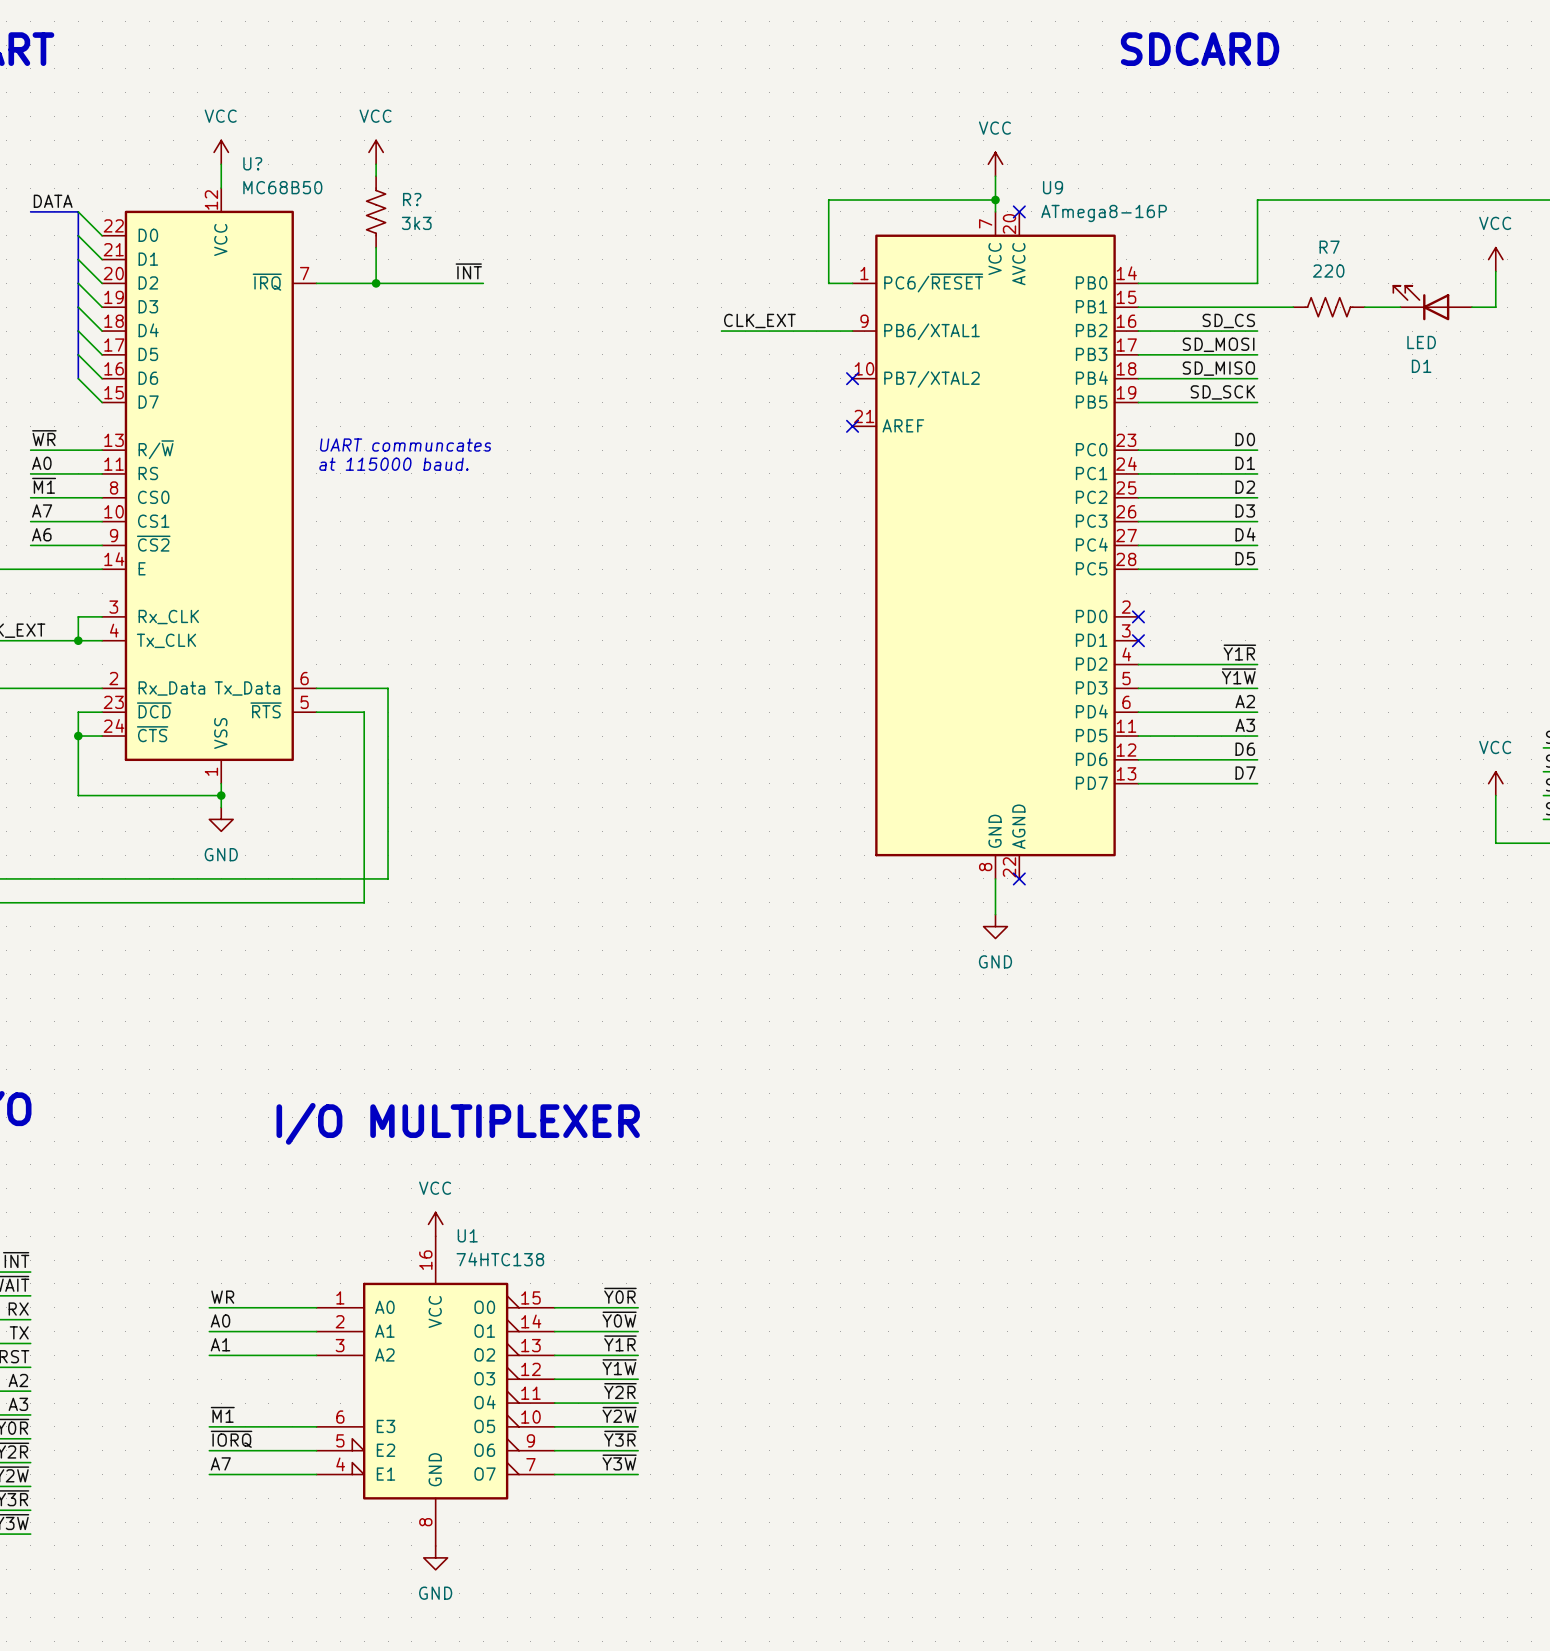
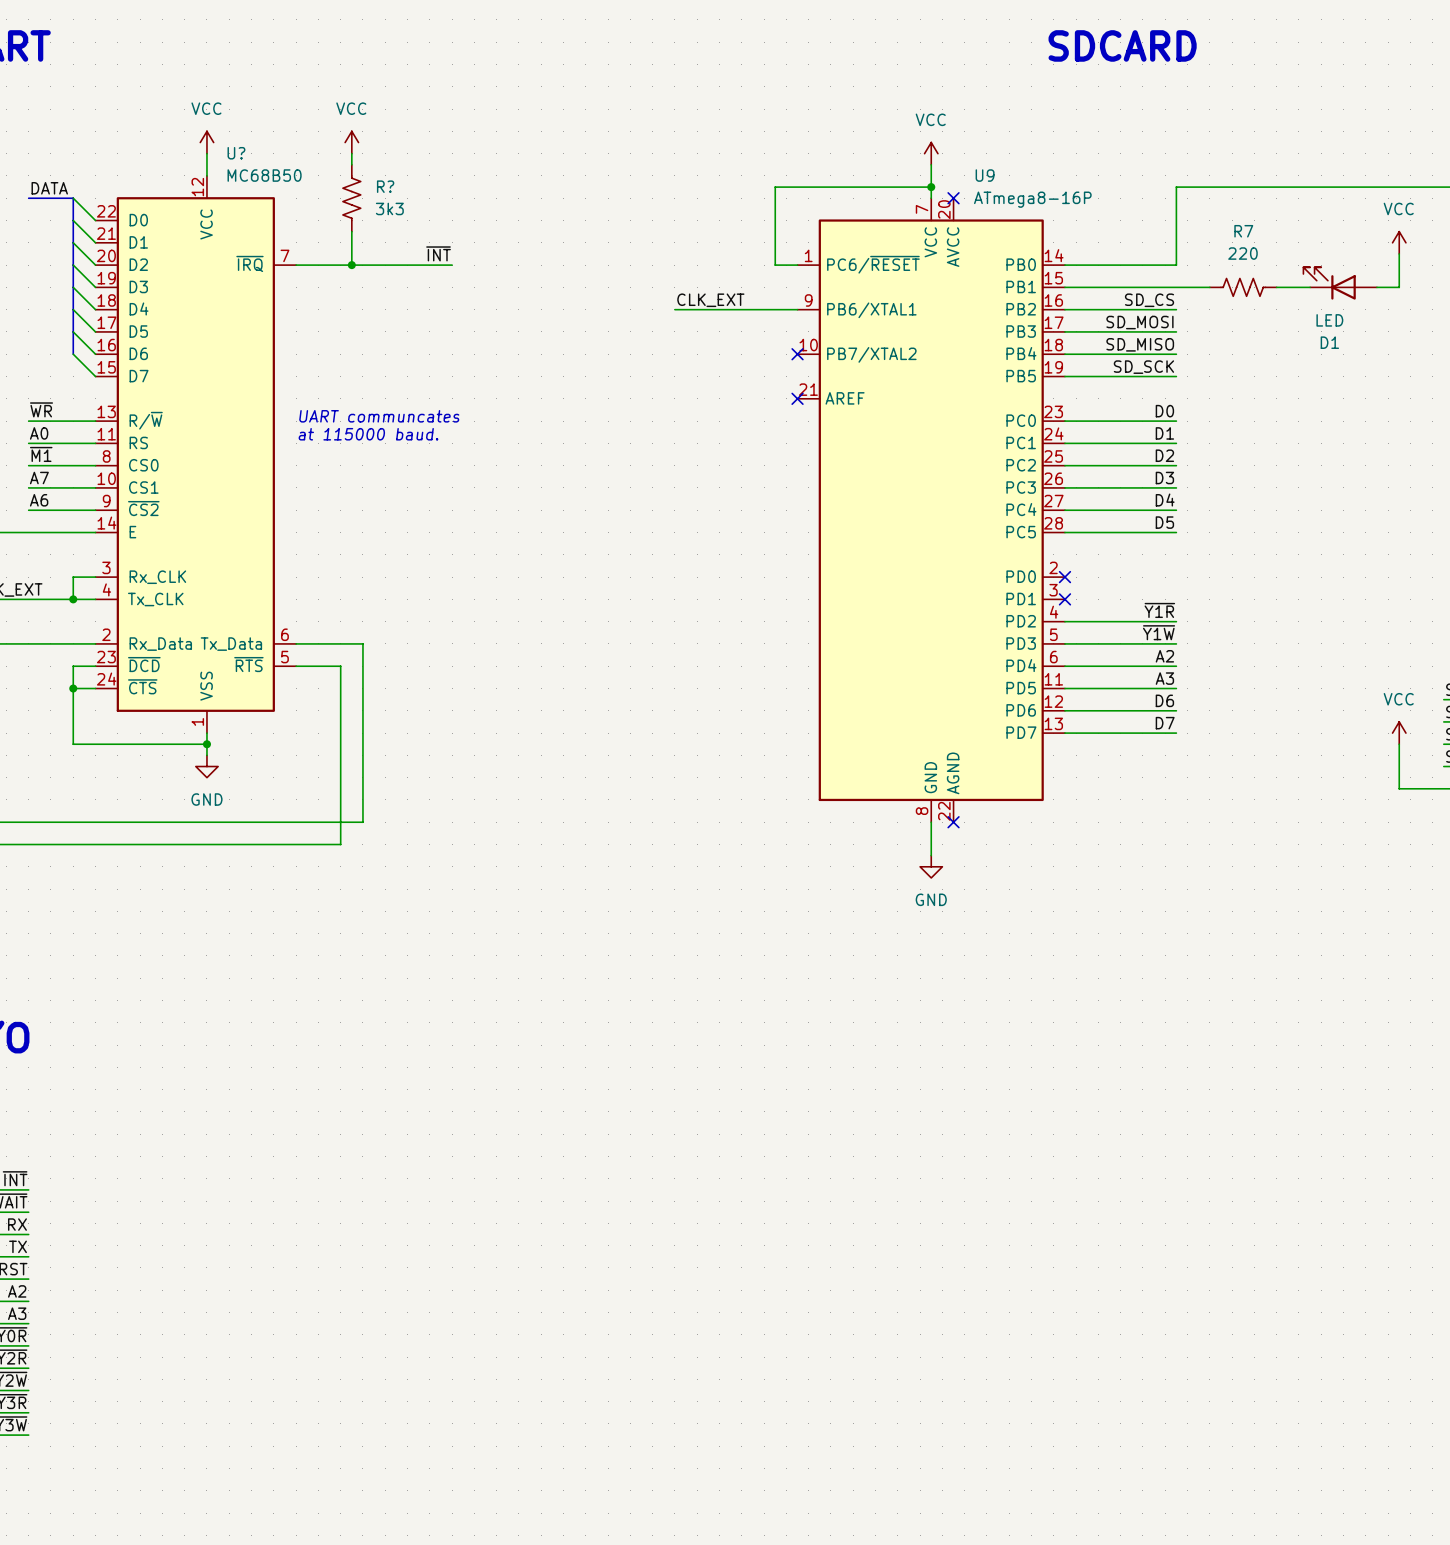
text: I/O MULTIPLEXER (458, 1123) -> none
power symbol: VCC (435, 1224) -> none
label: ~{Y0R} (620, 1295) -> none
label: WR (222, 1297) -> none
wire: (209, 1307) (316, 1307) -> none
wire: (554, 1307) (638, 1307) -> none
label: ~{Y0W} (619, 1319) -> none
label: A0 (220, 1320) -> none
wire: (209, 1331) (316, 1331) -> none
wire: (554, 1331) (638, 1331) -> none
label: ~{Y1R} (620, 1343) -> none
label: A1 (220, 1344) -> none
wire: (209, 1355) (316, 1355) -> none
wire: (554, 1355) (638, 1355) -> none
label: ~{Y1W} (619, 1367) -> none
wire: (554, 1379) (638, 1379) -> none
U1: 74HTC138 (435, 1391) -> none
label: ~{Y2R} (620, 1391) -> none
wire: (554, 1403) (638, 1403) -> none
label: ~{M1} (222, 1414) -> none
label: ~{Y2W} (619, 1414) -> none
wire: (209, 1426) (316, 1426) -> none
wire: (554, 1426) (638, 1426) -> none
label: ~{Y3R} (620, 1438) -> none
label: ~{IORQ} (231, 1439) -> none
wire: (209, 1450) (316, 1450) -> none
wire: (554, 1450) (638, 1450) -> none
label: ~{Y3W} (619, 1462) -> none
label: A7 (220, 1463) -> none
wire: (209, 1474) (316, 1474) -> none
wire: (554, 1474) (638, 1474) -> none
power symbol: GND (435, 1557) -> none

